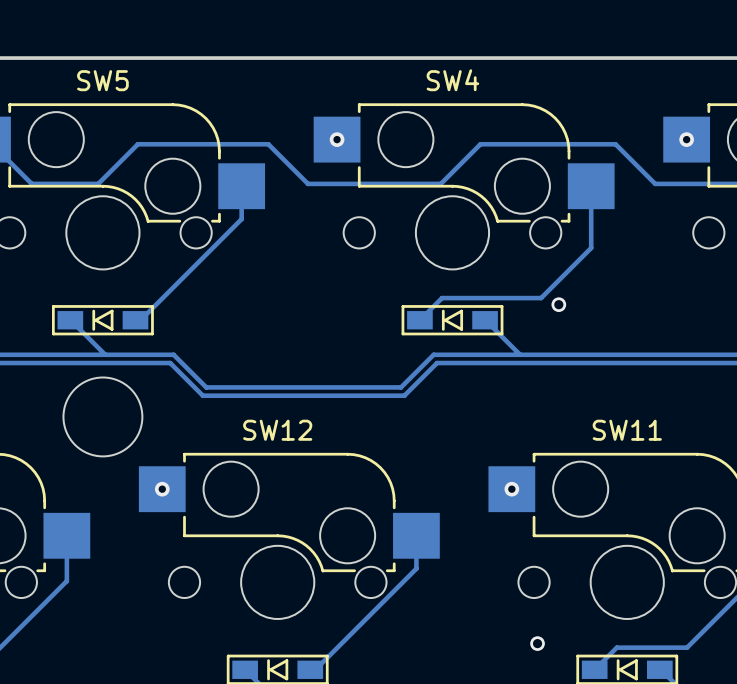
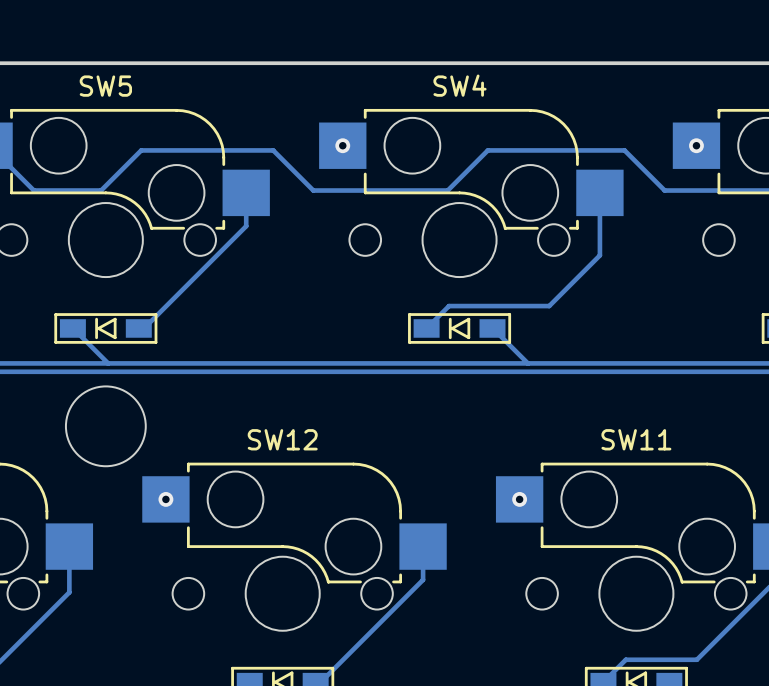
via: (558, 304) -> none
track: (433, 354) (401, 387) (206, 387) (173, 354) -> (440, 363) (177, 363)
track: (437, 363) (404, 395) (202, 395) (170, 363) -> (443, 371) (173, 371)
via: (537, 643) -> none

